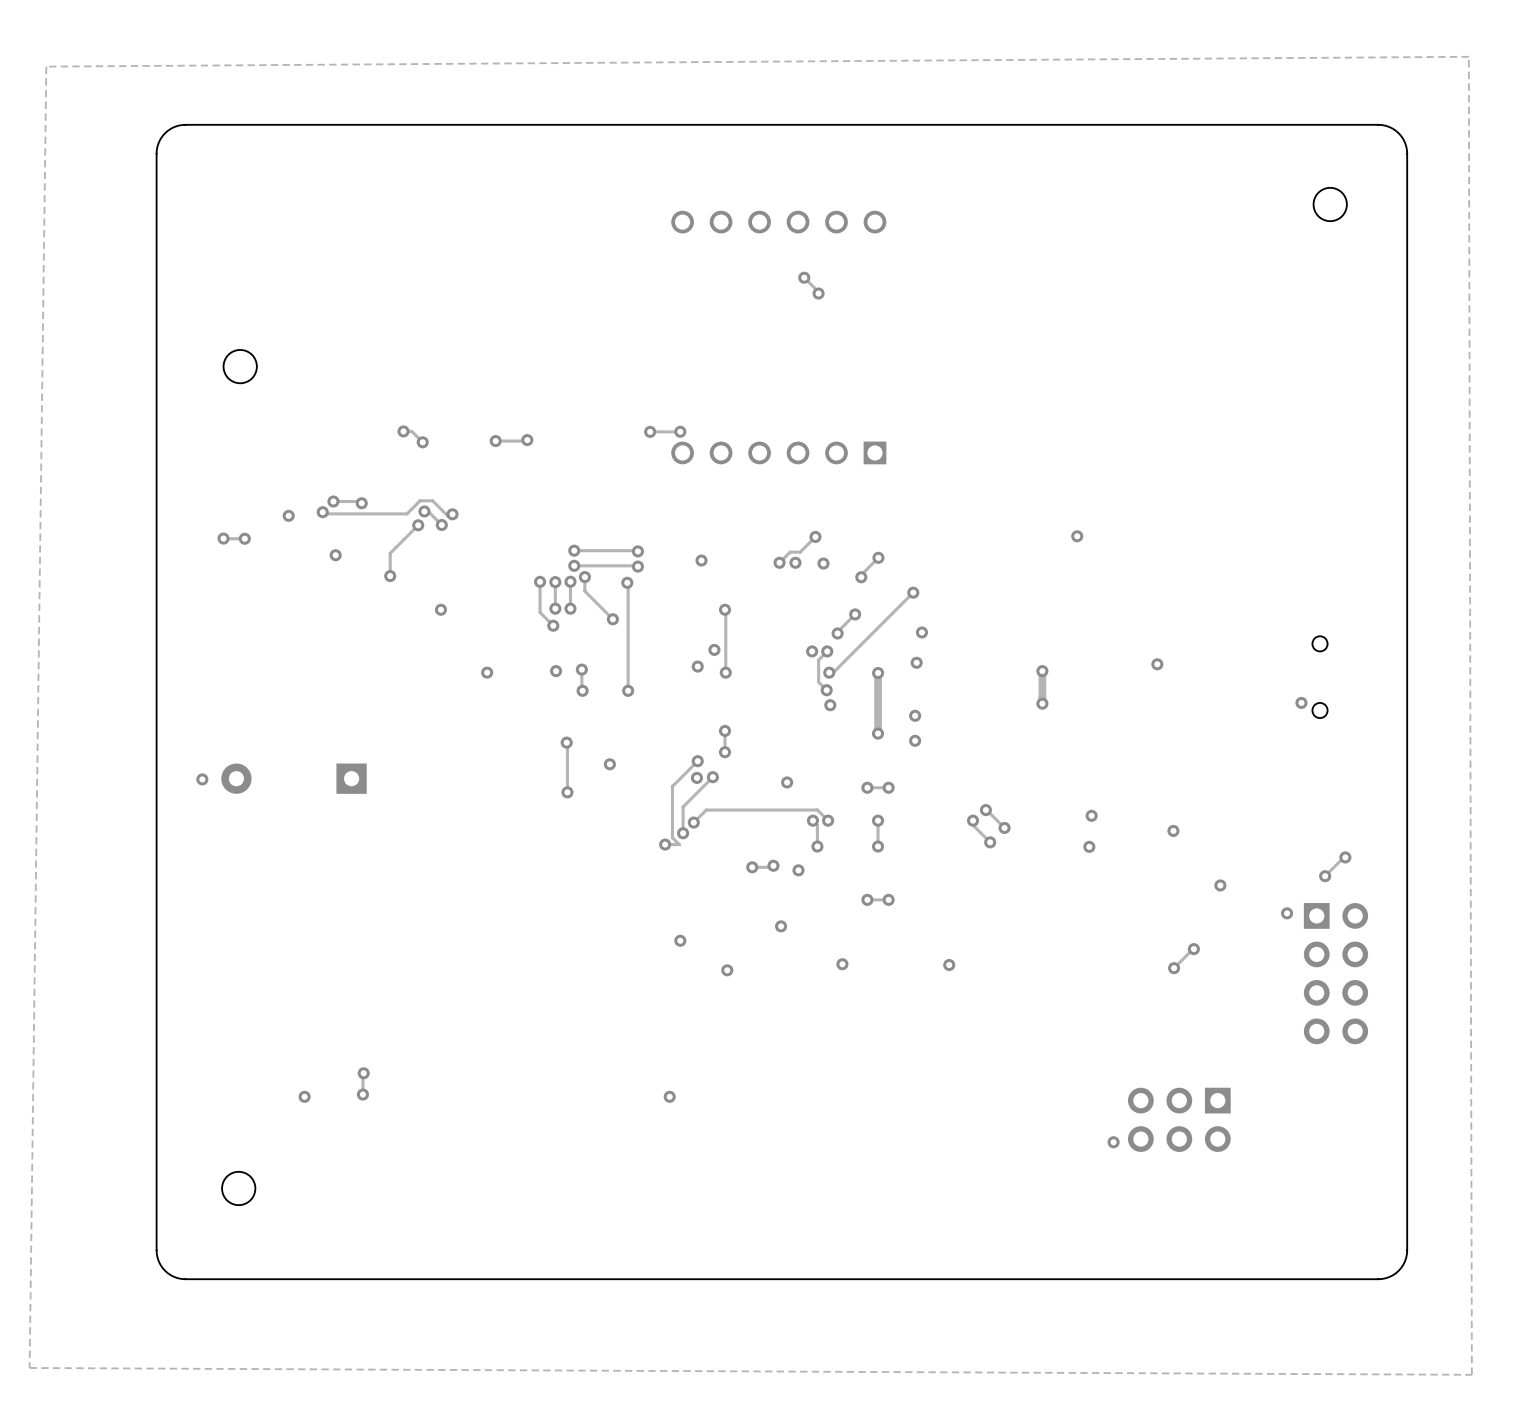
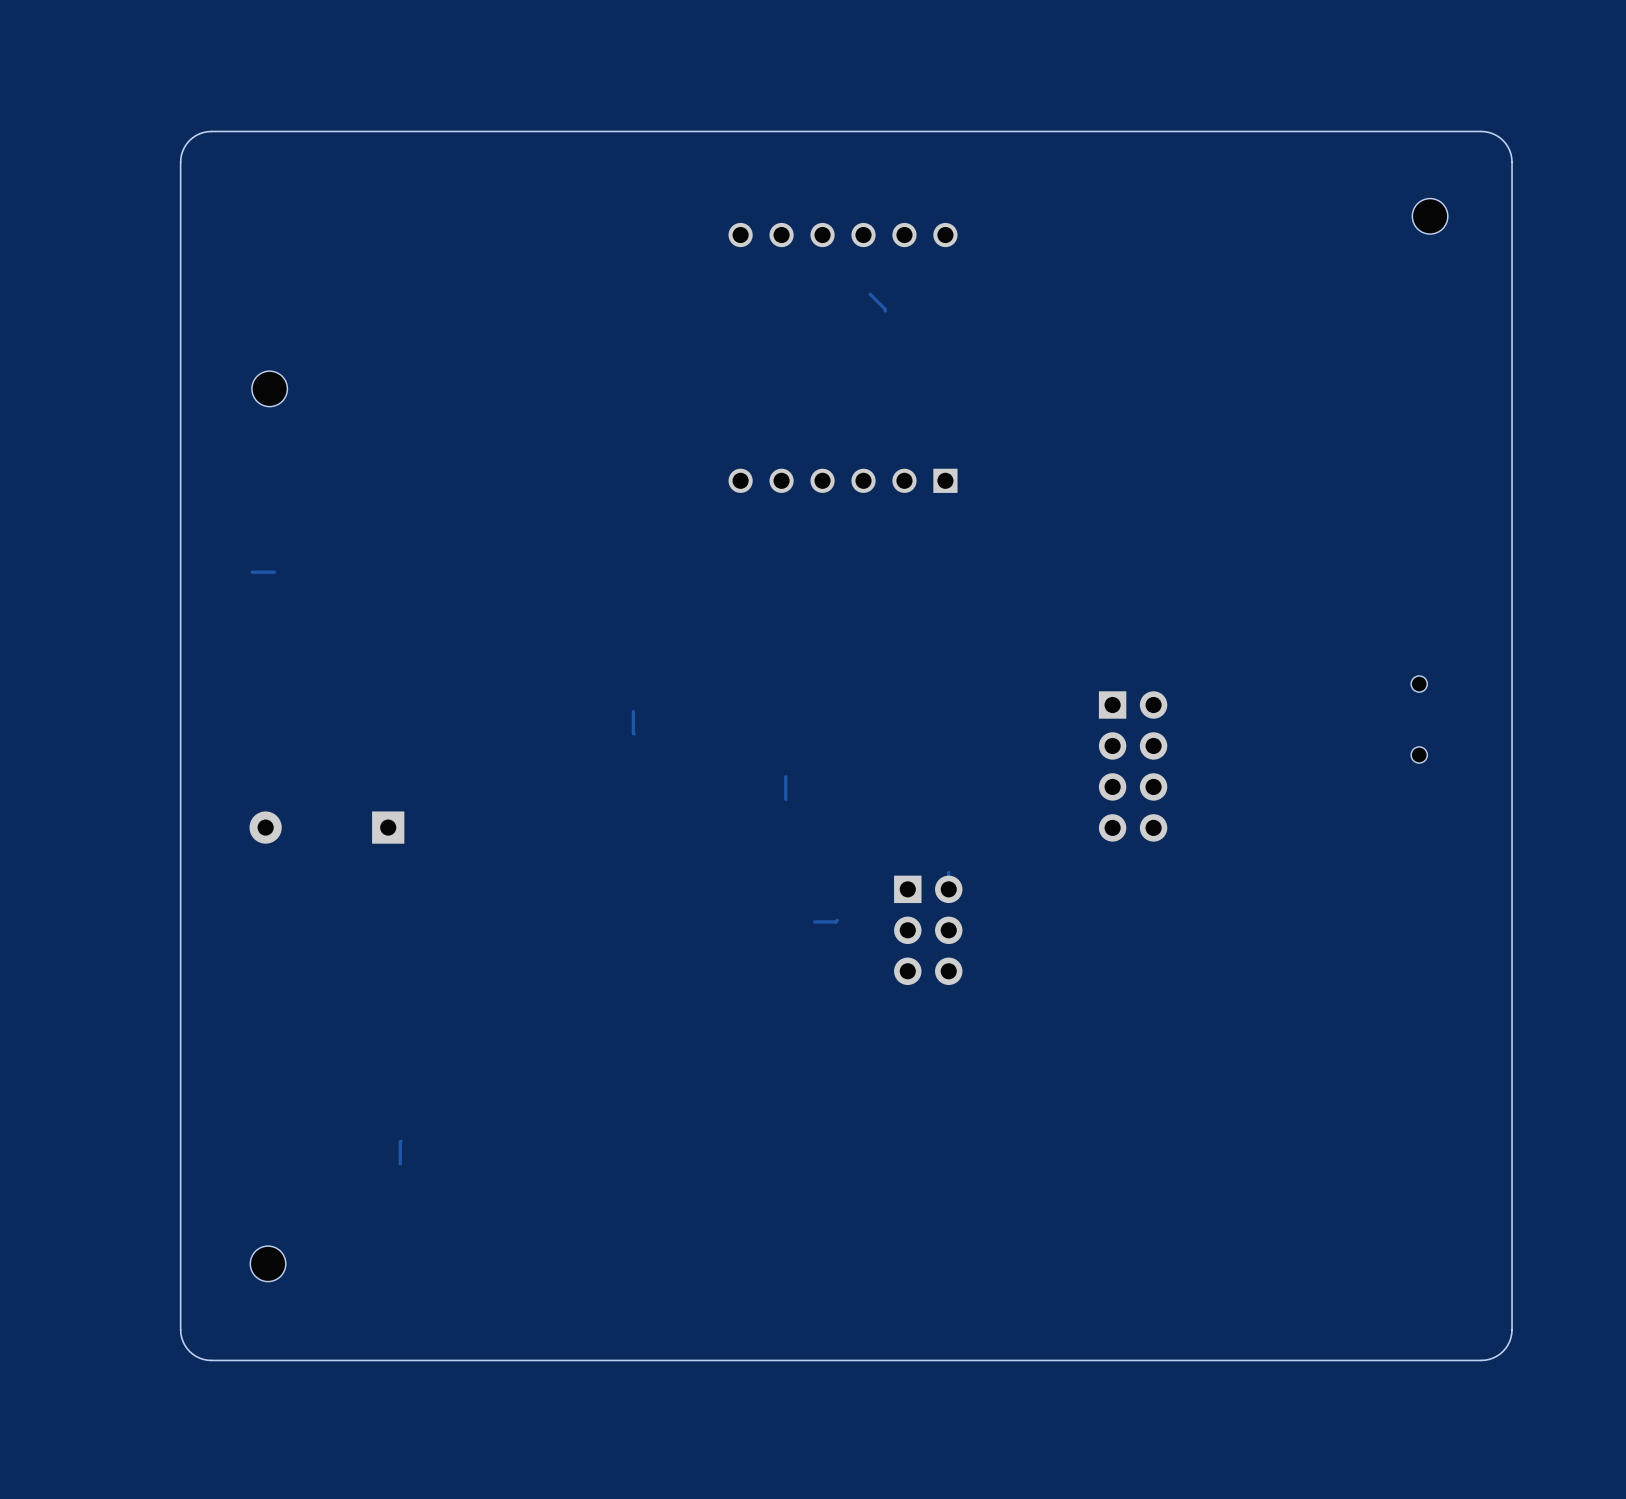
zone outline: (1468, 56) (1471, 1374) (29, 1367) (46, 66) (1468, 56) -> none
via: (804, 277) -> none
via: (818, 293) -> none
track: (403, 431) (411, 431) (422, 442) -> none
via: (403, 431) -> none
via: (650, 431) -> none
track: (680, 431) (650, 431) -> none
via: (680, 431) -> none
track: (527, 440) (495, 441) -> none
via: (527, 440) -> none
via: (495, 441) -> none
via: (422, 442) -> none
track: (333, 501) (359, 501) (361, 503) -> none
via: (333, 501) -> none
via: (361, 503) -> none
track: (424, 511) (428, 511) (441, 525) -> none
via: (424, 511) -> none
track: (322, 512) (324, 513) (406, 513) (420, 500) (432, 500) (448, 516) (452, 514) -> none
via: (322, 512) -> none
via: (452, 514) -> none
via: (288, 515) -> none
track: (418, 525) (390, 553) (390, 576) -> none
via: (418, 525) -> none
via: (441, 525) -> none
track: (815, 536) (800, 552) (790, 552) (779, 562) -> none
via: (815, 536) -> none
via: (1077, 536) -> none
via: (223, 538) -> none
via: (244, 538) -> none
track: (574, 550) (637, 551) -> none
via: (574, 550) -> none
via: (637, 551) -> none
via: (335, 555) -> none
track: (878, 557) (861, 574) (861, 577) -> none
via: (878, 557) -> none
via: (701, 560) -> none
via: (779, 562) -> none
via: (795, 562) -> none
via: (823, 563) -> none
track: (574, 565) (637, 566) -> none
via: (574, 565) -> none
via: (637, 566) -> none
via: (390, 576) -> none
track: (584, 577) (584, 591) (612, 619) -> none
via: (584, 577) -> none
via: (861, 577) -> none
track: (540, 581) (540, 612) (553, 625) -> none
via: (540, 581) -> none
track: (570, 581) (570, 608) -> none
via: (570, 581) -> none
track: (555, 582) (555, 608) -> none
via: (555, 582) -> none
track: (627, 582) (628, 690) -> none
via: (627, 582) -> none
track: (913, 592) (833, 672) (829, 672) -> none
via: (913, 592) -> none
via: (555, 608) -> none
via: (570, 608) -> none
via: (440, 609) -> none
track: (725, 609) (725, 672) -> none
via: (725, 609) -> none
track: (855, 614) (837, 633) -> none
via: (855, 614) -> none
via: (612, 619) -> none
via: (553, 625) -> none
via: (921, 632) -> none
via: (837, 633) -> none
via: (714, 649) -> none
via: (812, 651) -> none
track: (827, 651) (818, 660) (818, 682) (826, 690) -> none
via: (827, 651) -> none
via: (916, 662) -> none
via: (1157, 664) -> none
via: (697, 666) -> none
via: (581, 669) -> none
via: (556, 671) -> none
track: (1042, 671) (1042, 703) -> none
via: (1042, 671) -> none
via: (487, 672) -> none
via: (725, 672) -> none
via: (829, 672) -> none
track: (878, 673) (878, 733) -> none
via: (878, 673) -> none
via: (582, 690) -> none
via: (628, 690) -> none
via: (826, 690) -> none
via: (1301, 702) -> none
via: (1042, 703) -> none
via: (830, 705) -> none
via: (915, 715) -> none
part: none -> (1133, 766)
via: (725, 730) -> none
via: (878, 733) -> none
via: (915, 740) -> none
track: (566, 742) (567, 792) -> none
via: (566, 742) -> none
via: (725, 752) -> none
track: (697, 761) (672, 786) (672, 837) (679, 844) (665, 844) -> none
via: (697, 761) -> none
via: (609, 764) -> none
via: (696, 777) -> none
track: (712, 777) (683, 806) (683, 833) -> none
via: (712, 777) -> none
via: (202, 779) -> none
via: (787, 782) -> none
via: (867, 787) -> none
track: (888, 787) (867, 787) -> none
via: (888, 787) -> none
via: (567, 792) -> none
track: (985, 810) (1004, 827) -> none
via: (985, 810) -> none
via: (1091, 815) -> none
track: (812, 820) (817, 825) (817, 846) -> none
via: (812, 820) -> none
track: (828, 820) (817, 810) (706, 810) (693, 822) -> none
via: (828, 820) -> none
via: (878, 820) -> none
track: (973, 820) (973, 825) (990, 842) -> none
via: (973, 820) -> none
via: (693, 822) -> none
via: (1004, 827) -> none
via: (1173, 830) -> none
via: (683, 833) -> none
via: (990, 842) -> none
via: (665, 844) -> none
via: (817, 846) -> none
via: (878, 846) -> none
via: (1089, 846) -> none
track: (1345, 857) (1325, 876) -> none
via: (1345, 857) -> none
via: (773, 865) -> none
via: (752, 867) -> none
via: (798, 870) -> none
part: none -> (928, 930)
via: (1325, 876) -> none
via: (1220, 885) -> none
via: (867, 899) -> none
track: (888, 899) (867, 899) -> none
via: (888, 899) -> none
via: (1287, 913) -> none
via: (781, 926) -> none
via: (680, 940) -> none
track: (1193, 949) (1174, 968) -> none
via: (1193, 949) -> none
via: (842, 964) -> none
via: (949, 965) -> none
via: (1174, 968) -> none
via: (727, 970) -> none
part: (1335, 973) -> none
via: (363, 1073) -> none
via: (362, 1094) -> none
via: (304, 1096) -> none
via: (669, 1096) -> none
part: (1179, 1119) -> none
via: (1113, 1142) -> none

